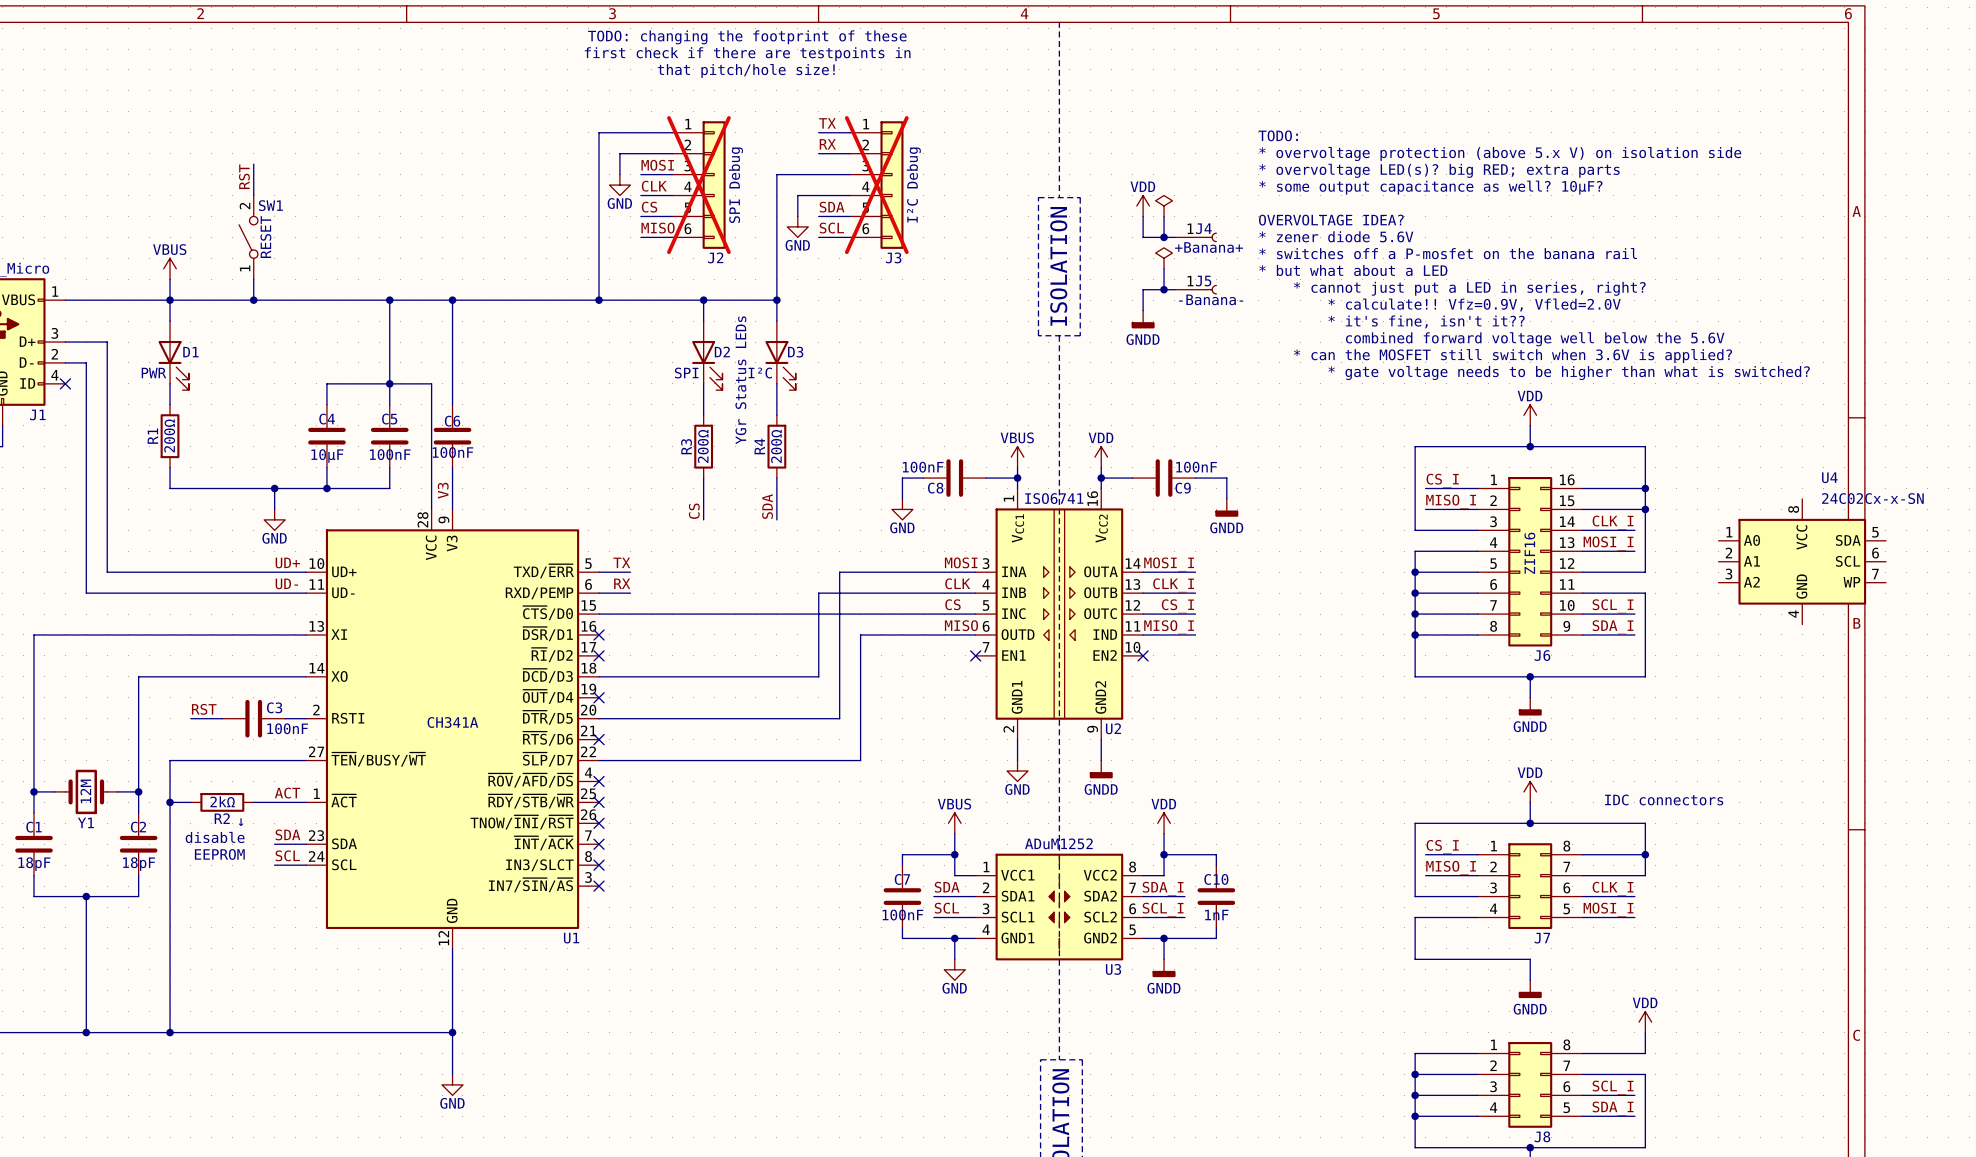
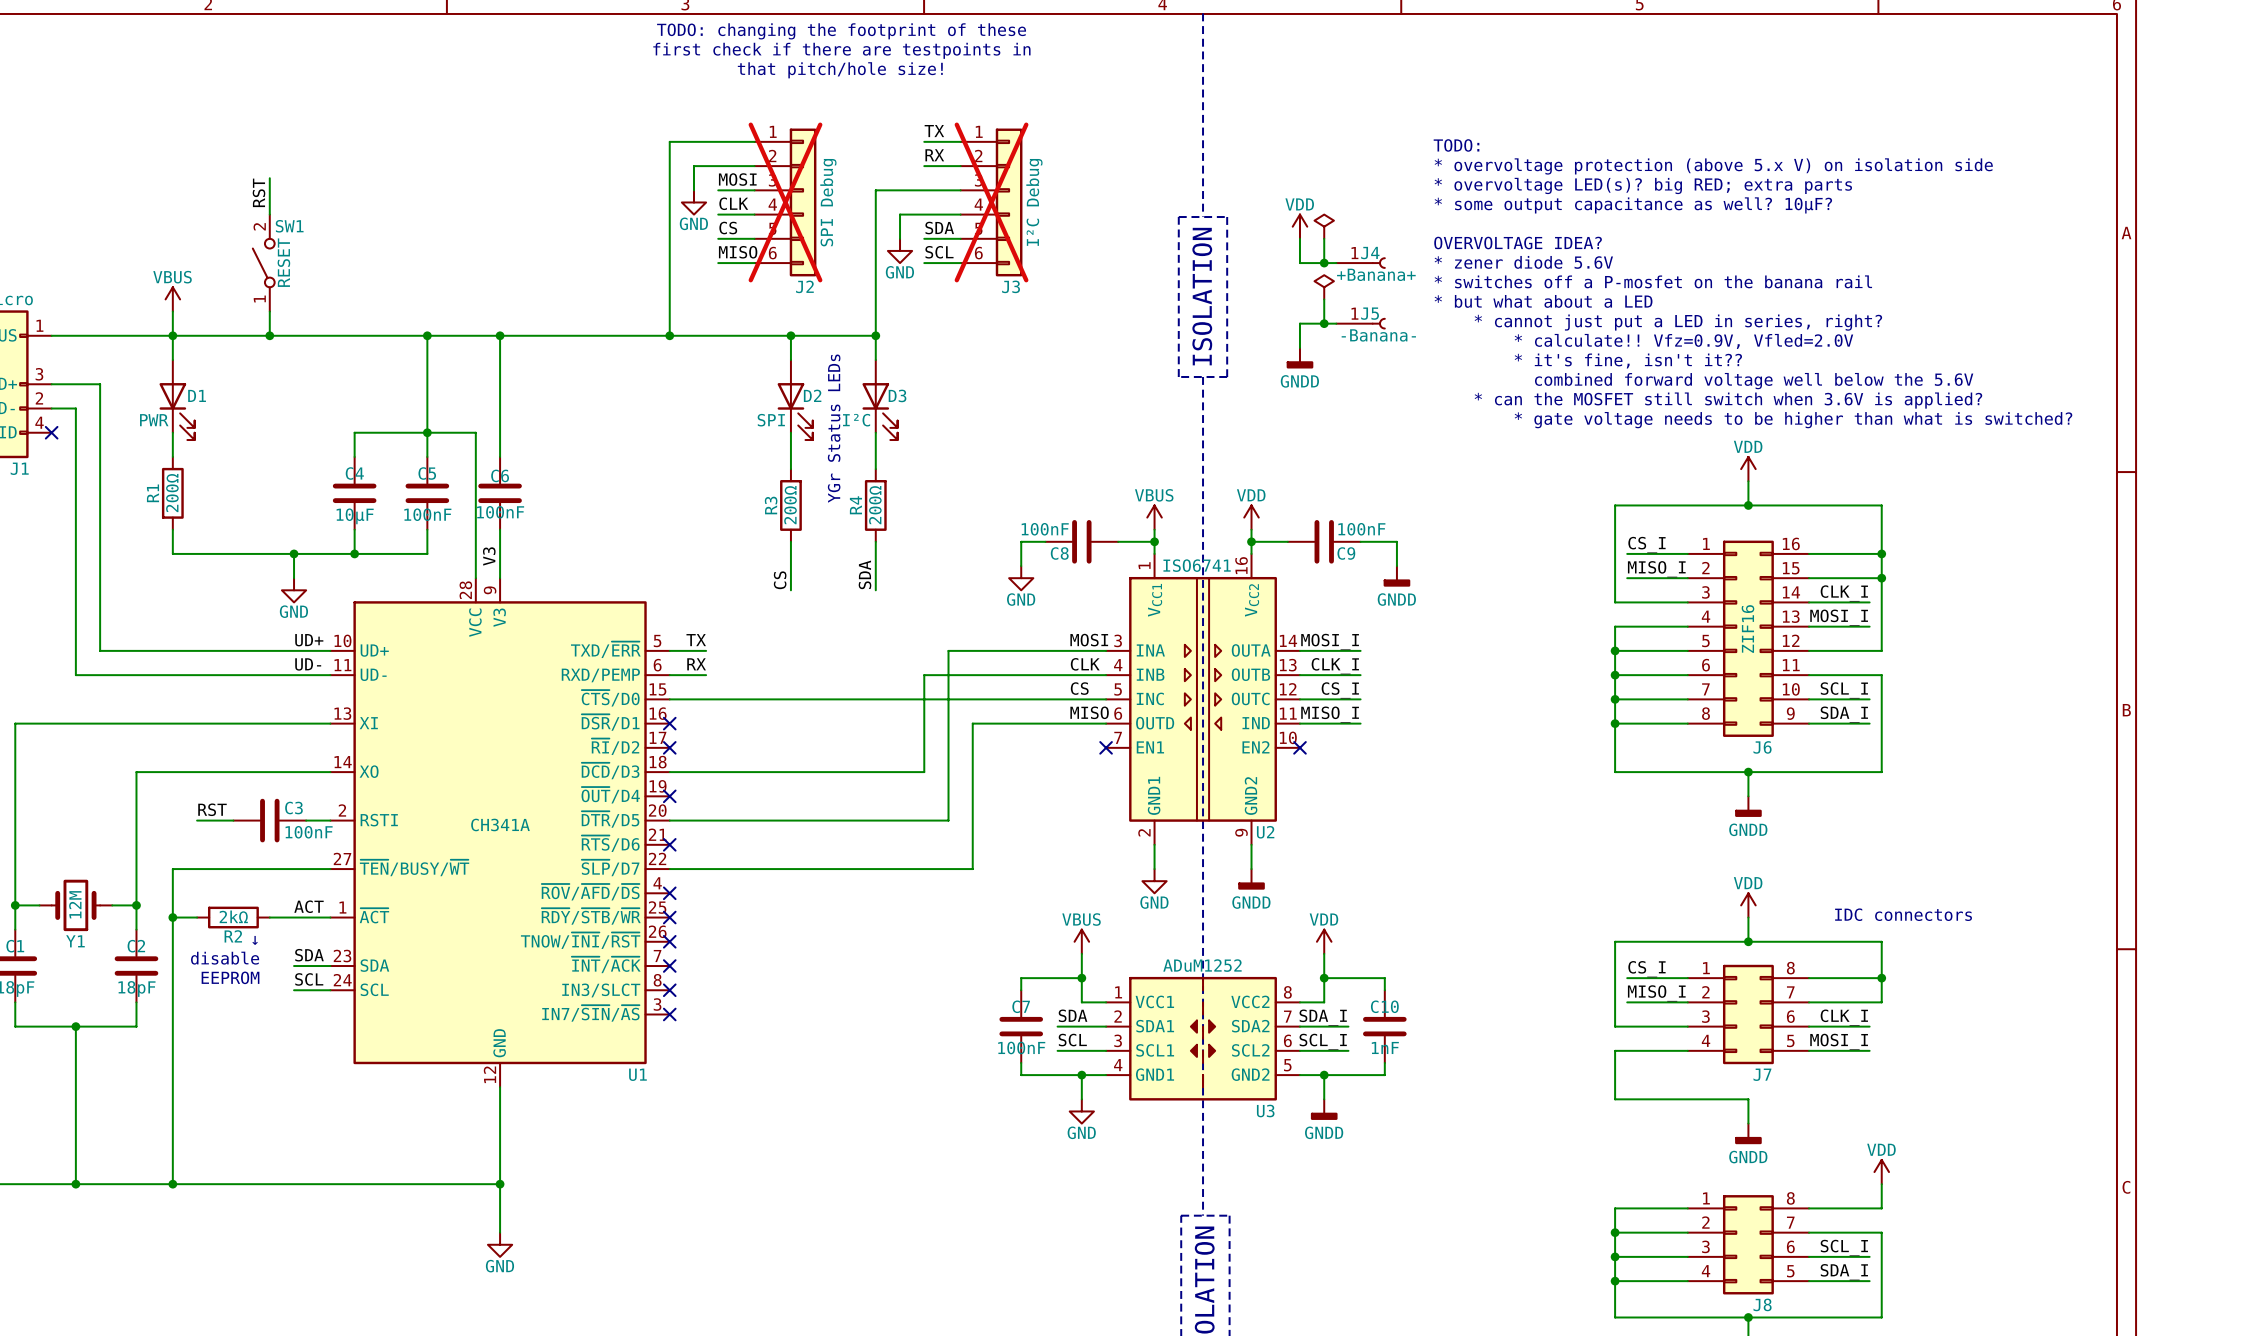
U4: 24C02Cx-x-SN (1802, 561) -> none

